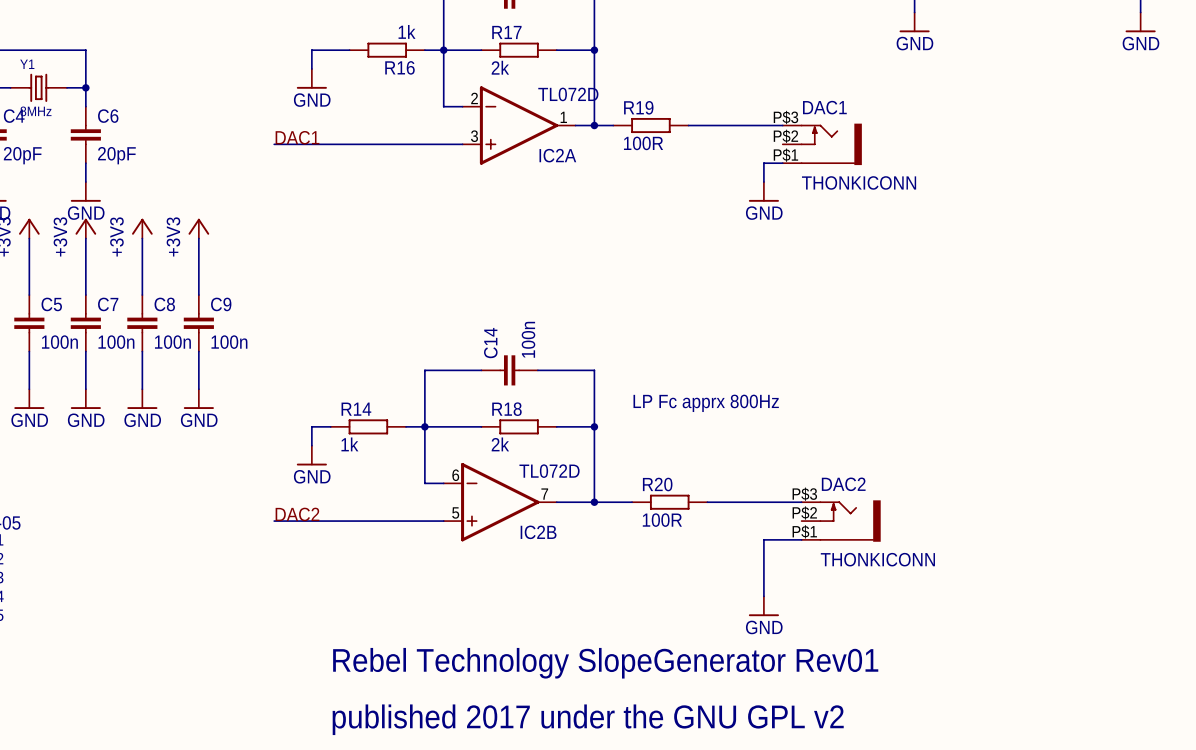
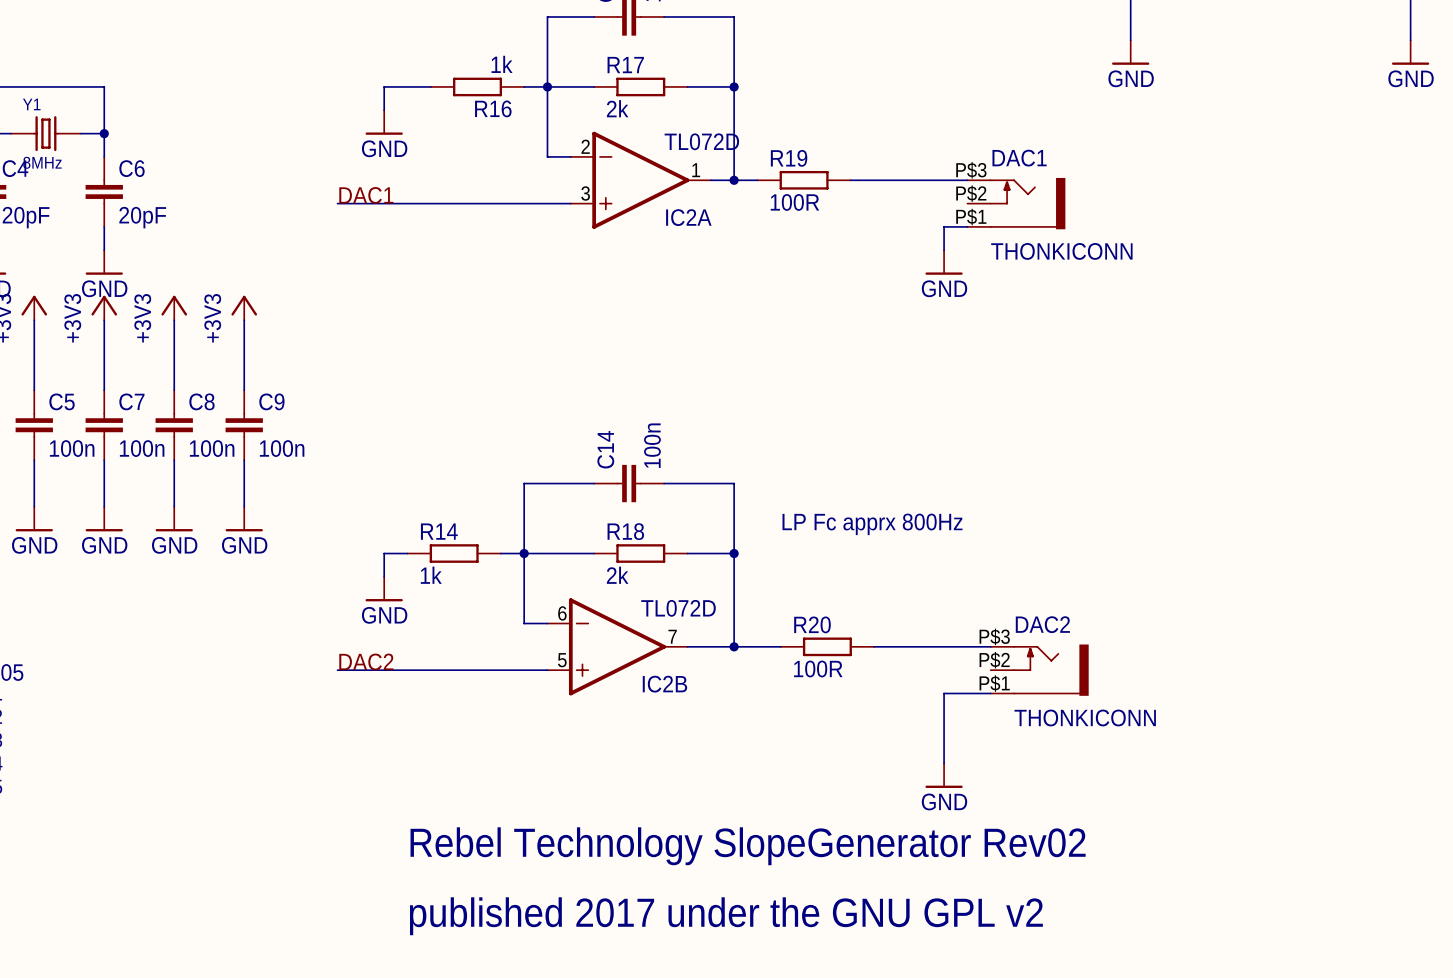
text: Rebel Technology SlopeGenerator Rev01 (605, 663) -> Rebel Technology SlopeGenerator Rev02 (748, 846)

